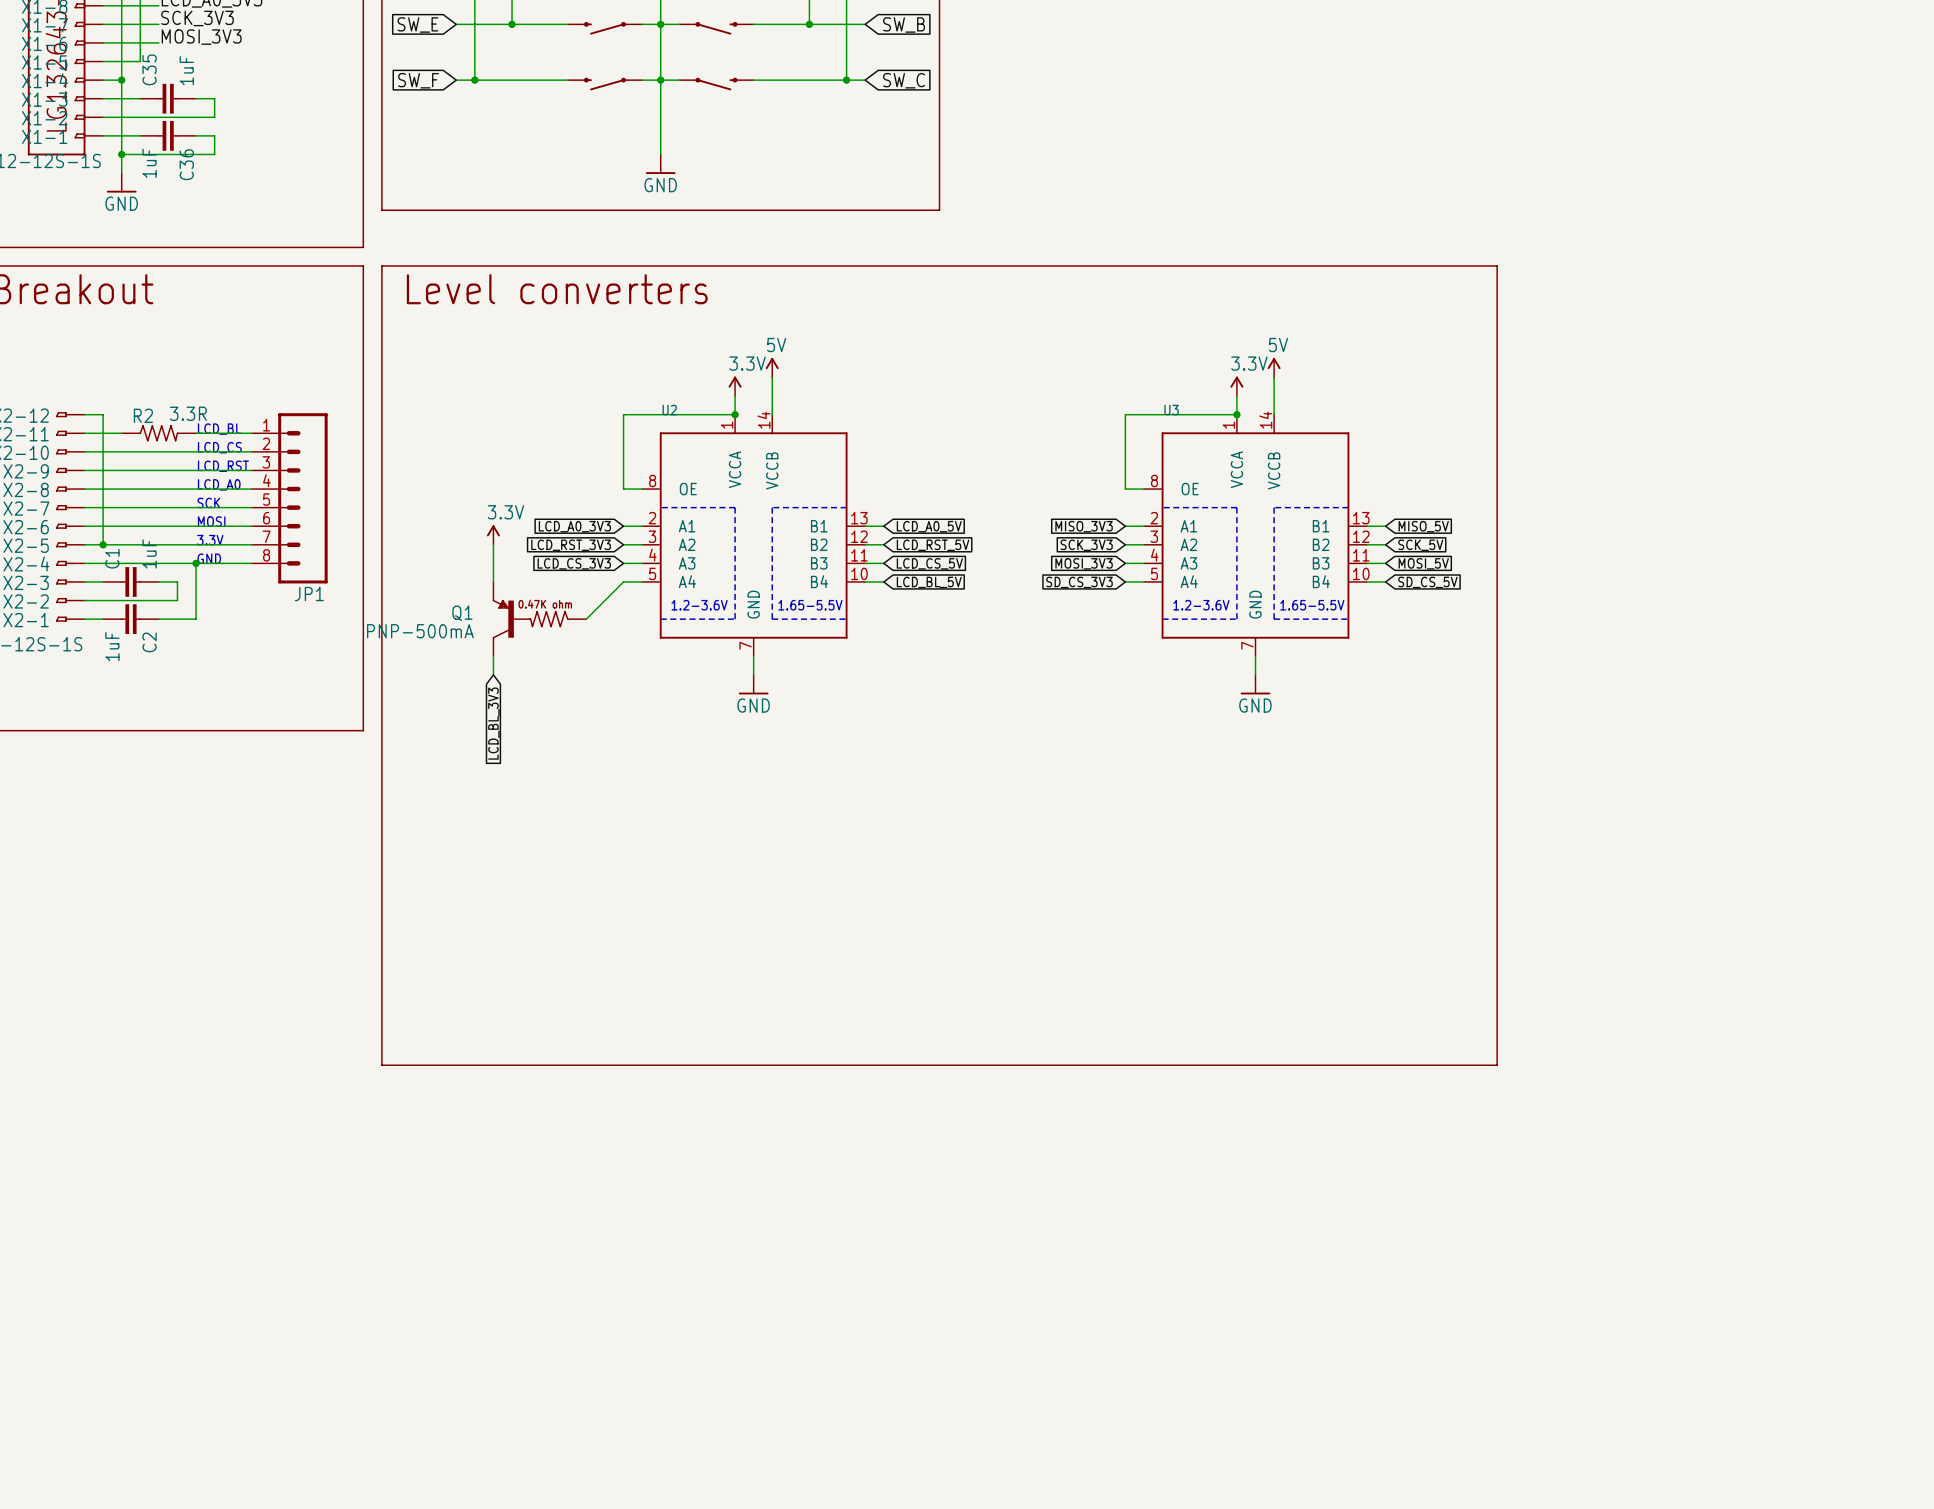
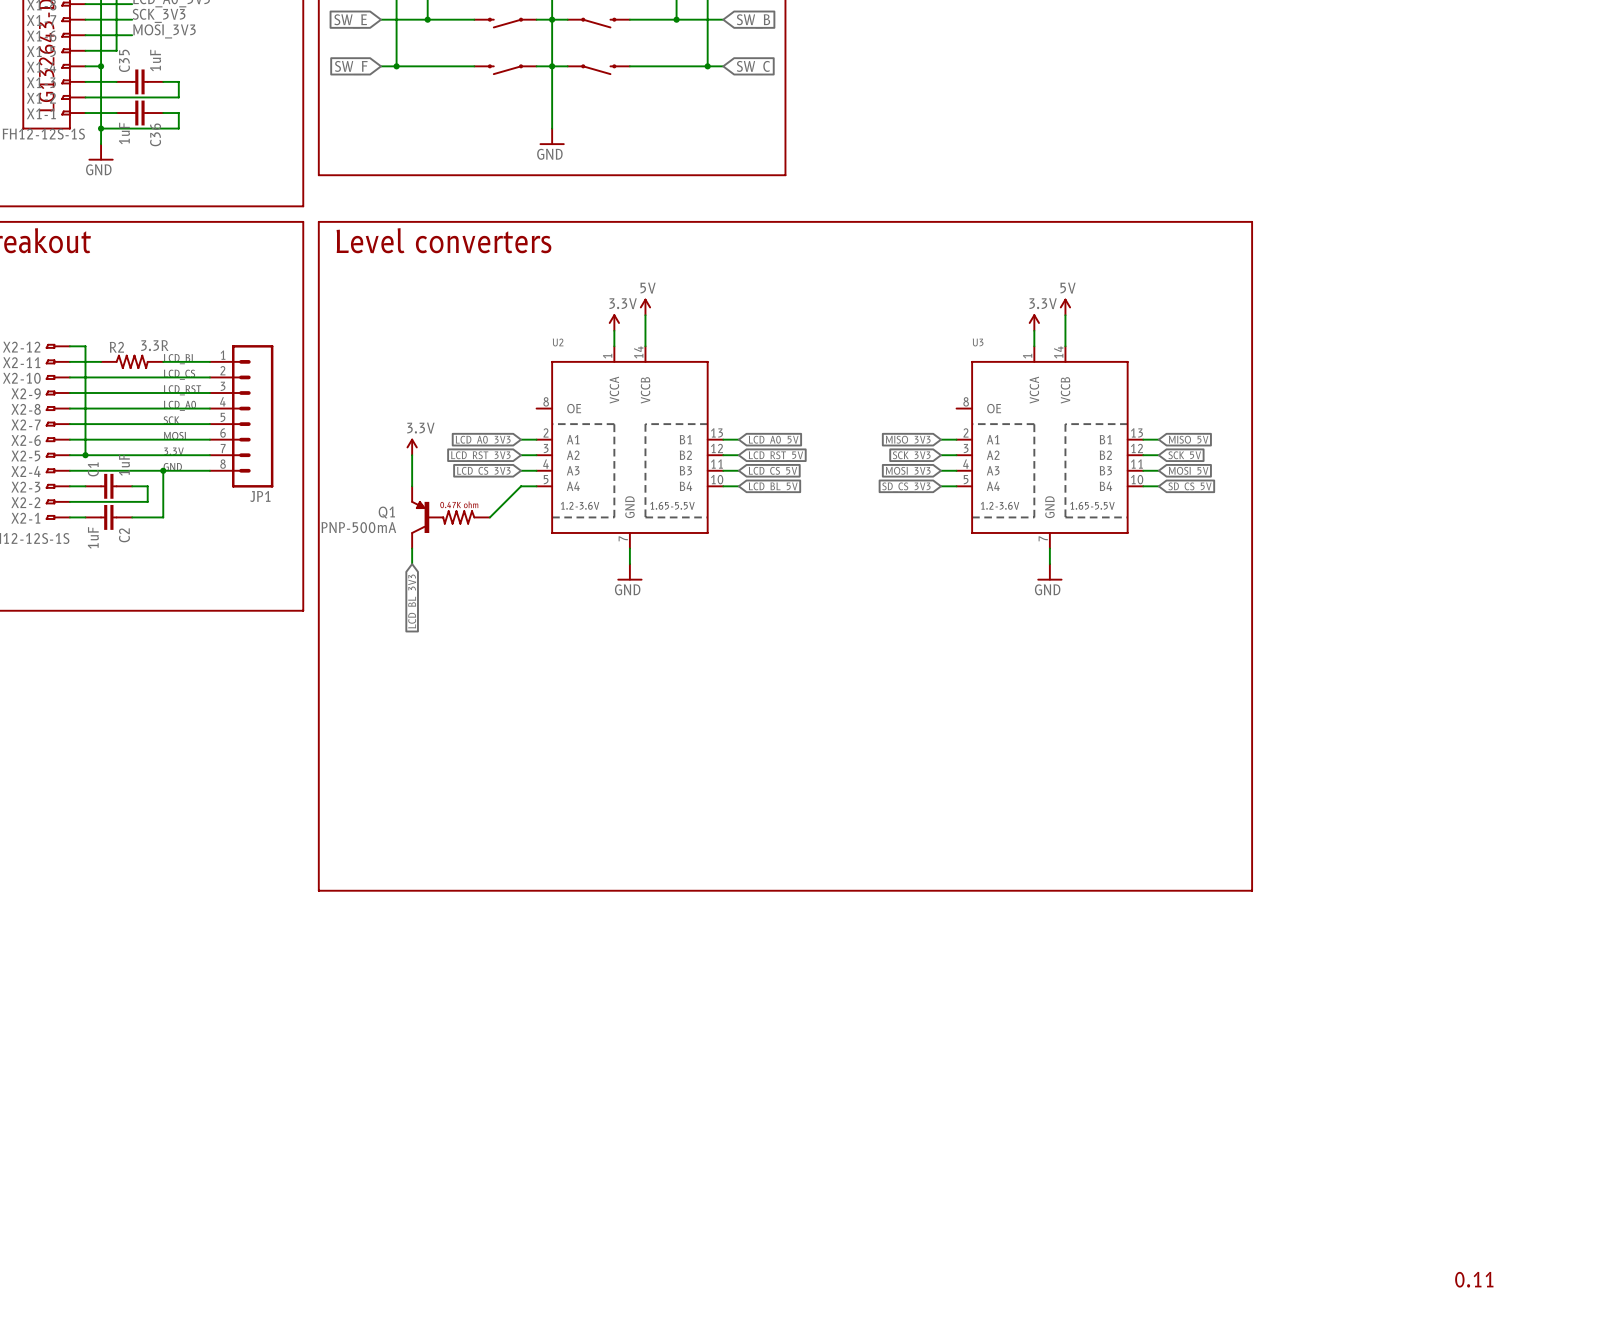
wire: (735, 414) (623, 414) (623, 489) (642, 489) -> none
junction: (735, 414) -> none
wire: (1236, 414) (1125, 414) (1125, 489) (1143, 489) -> none
junction: (1236, 414) -> none

